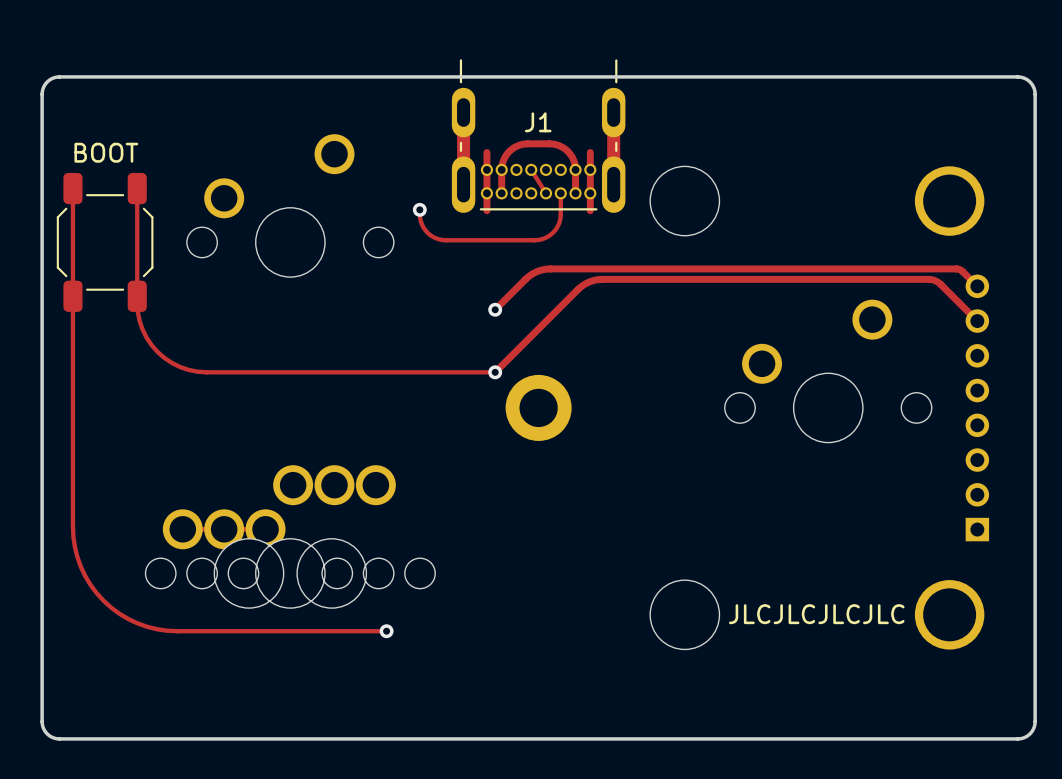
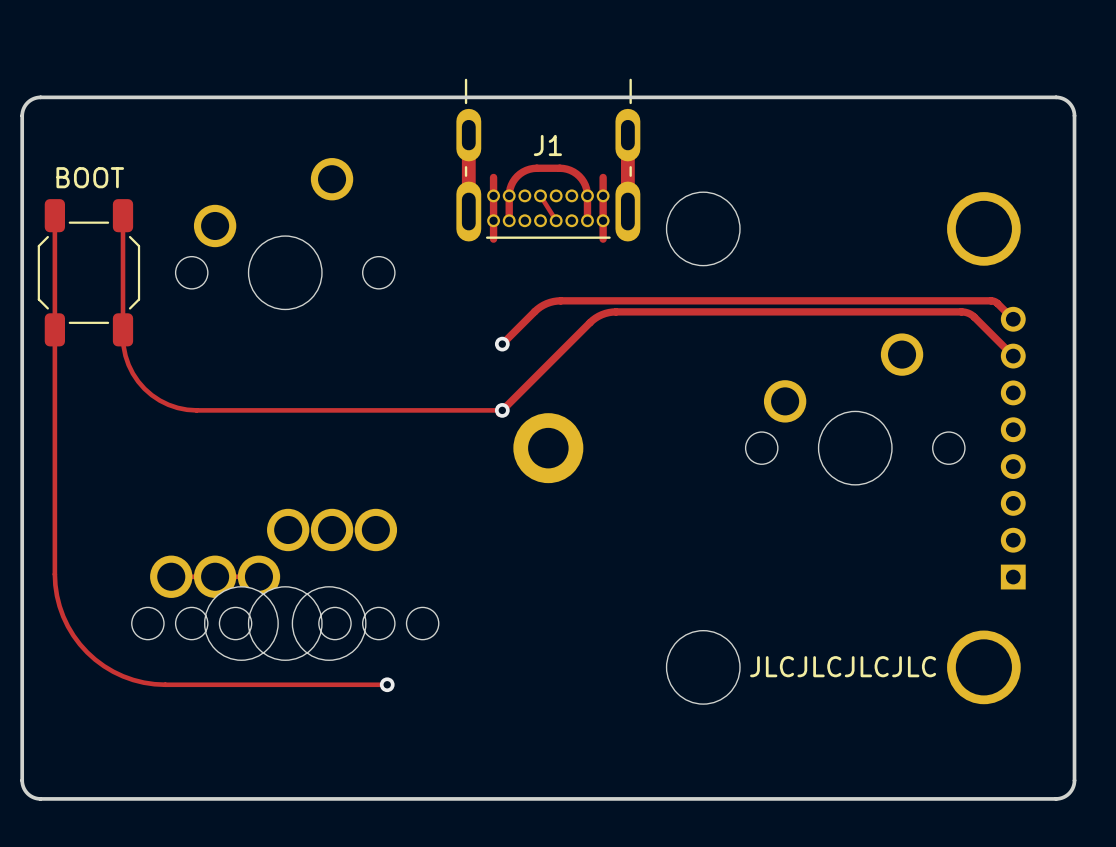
track: (560, 193) (558, 224) (550, 234) (538, 240) (439, 239) (430, 234) (423, 227) (419, 209) -> none
via: (419, 209) -> none

